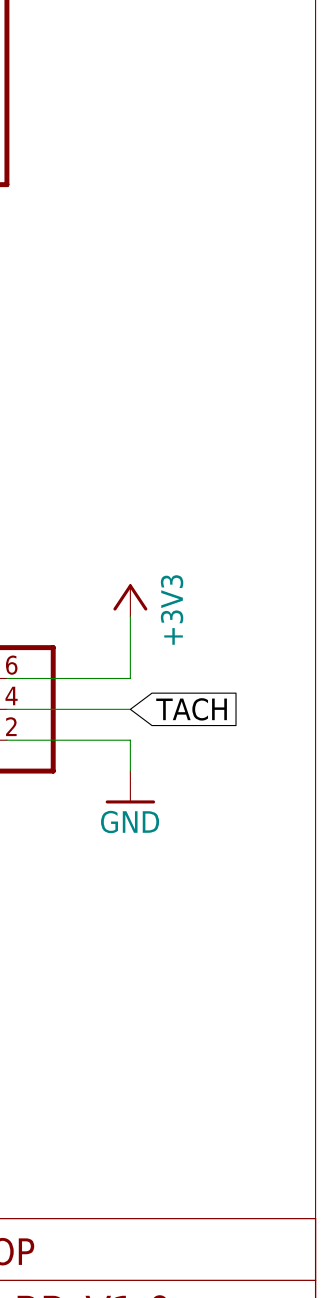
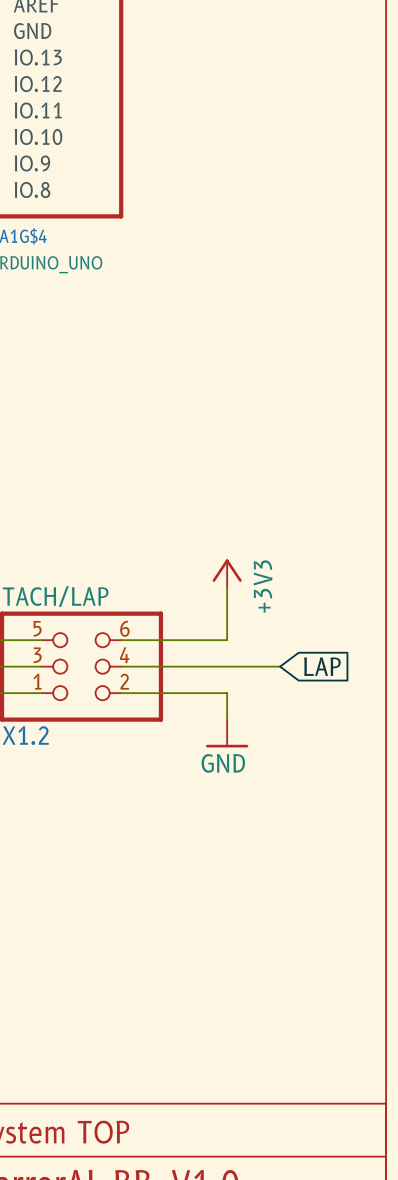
wire: none -> (227, 666) (280, 666)
global label: TACH (191, 709) -> none
global label: none -> LAP (322, 666)

